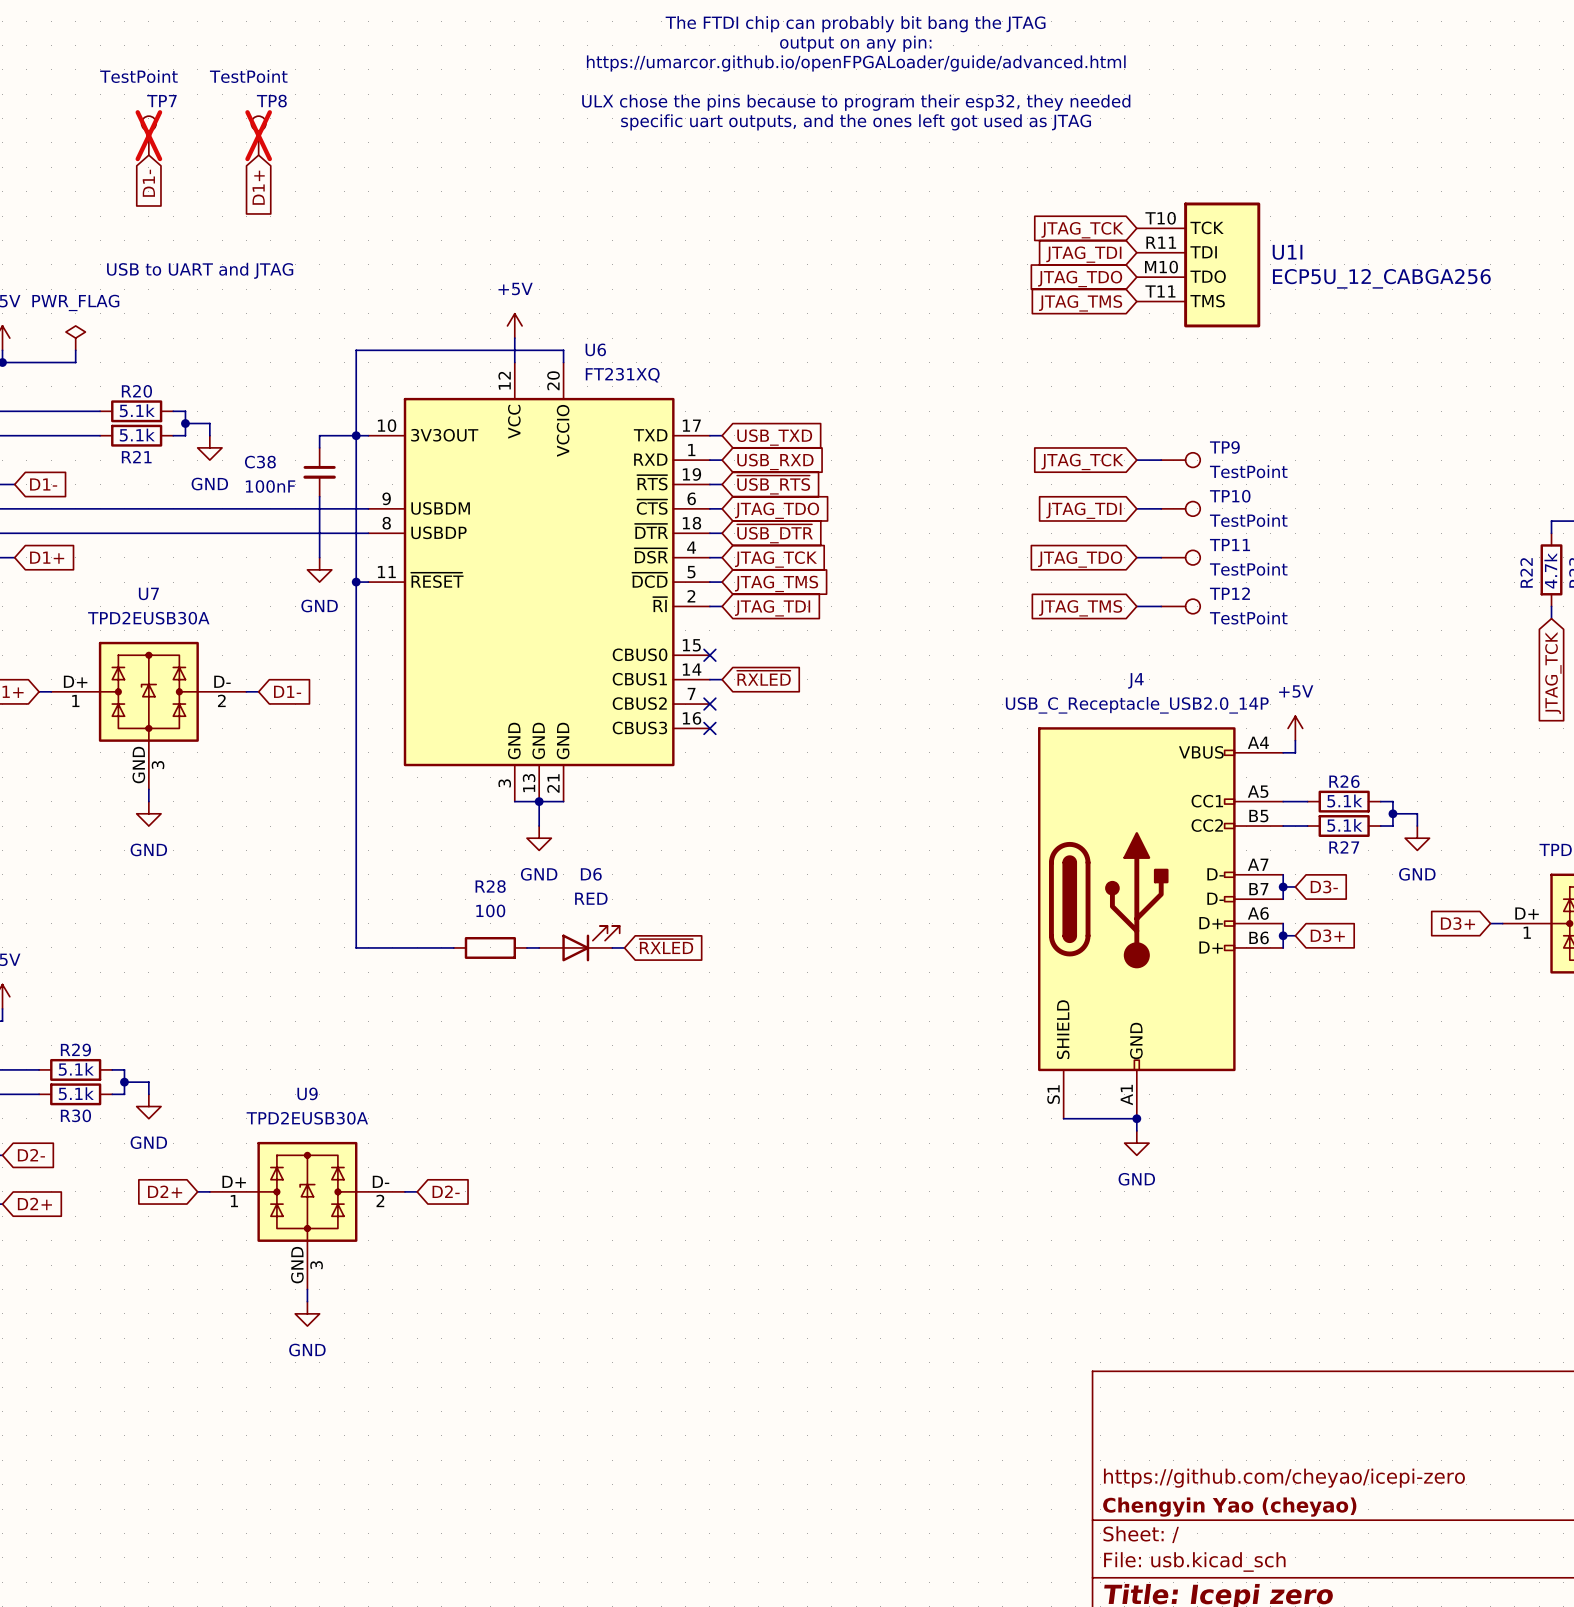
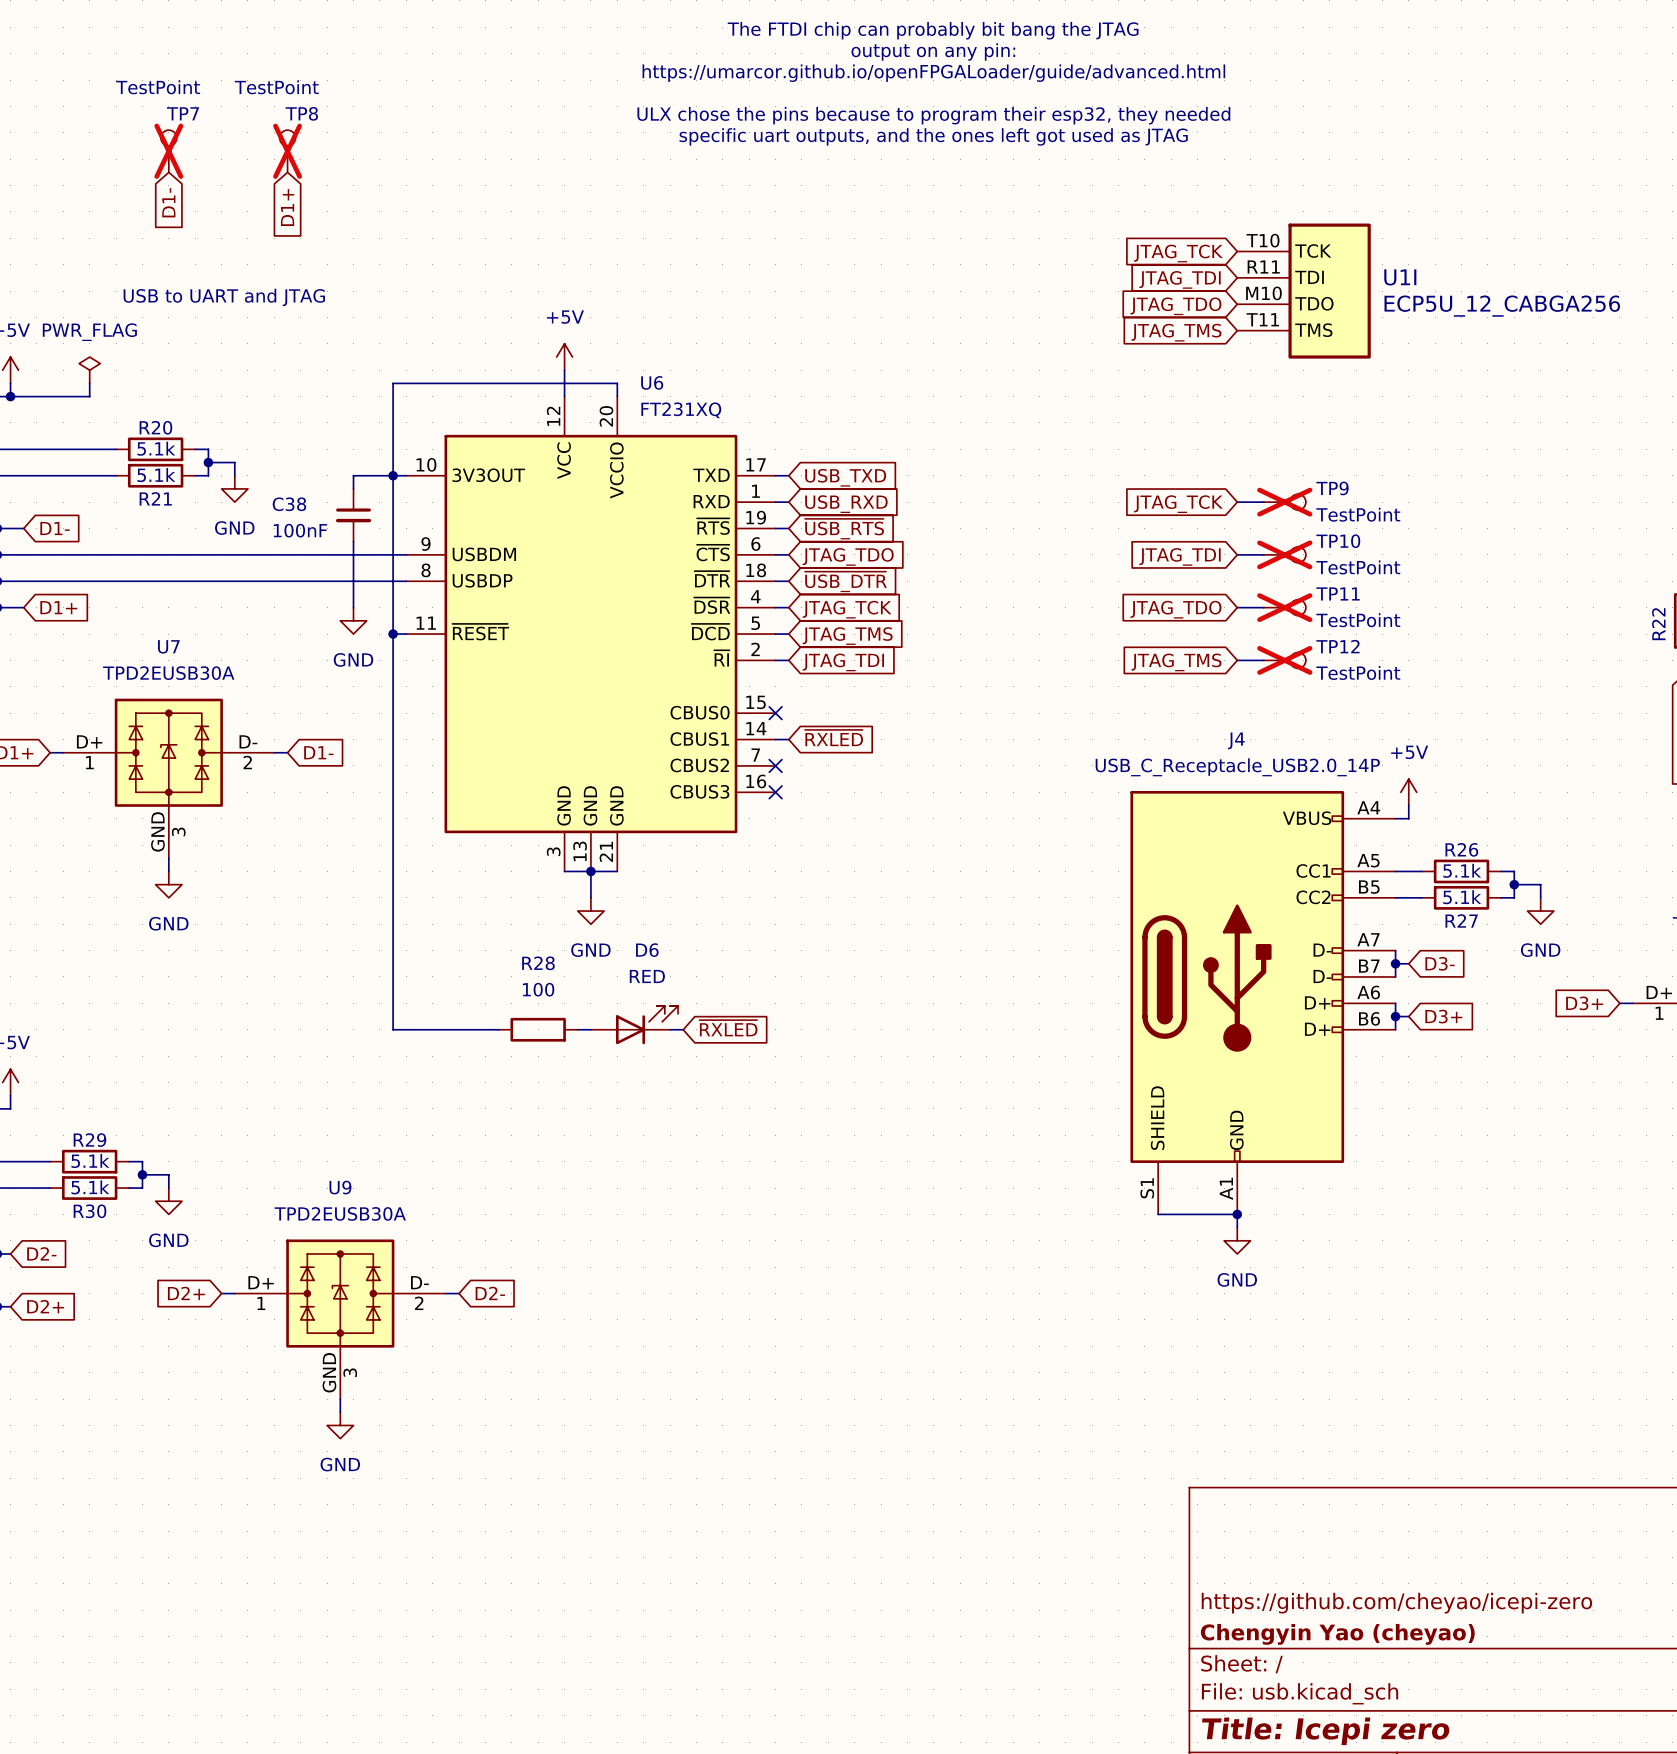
TP9 do-not-place cross: none -> (1284, 502)
TP10 do-not-place cross: none -> (1284, 554)
TP11 do-not-place cross: none -> (1284, 607)
TP12 do-not-place cross: none -> (1284, 660)

